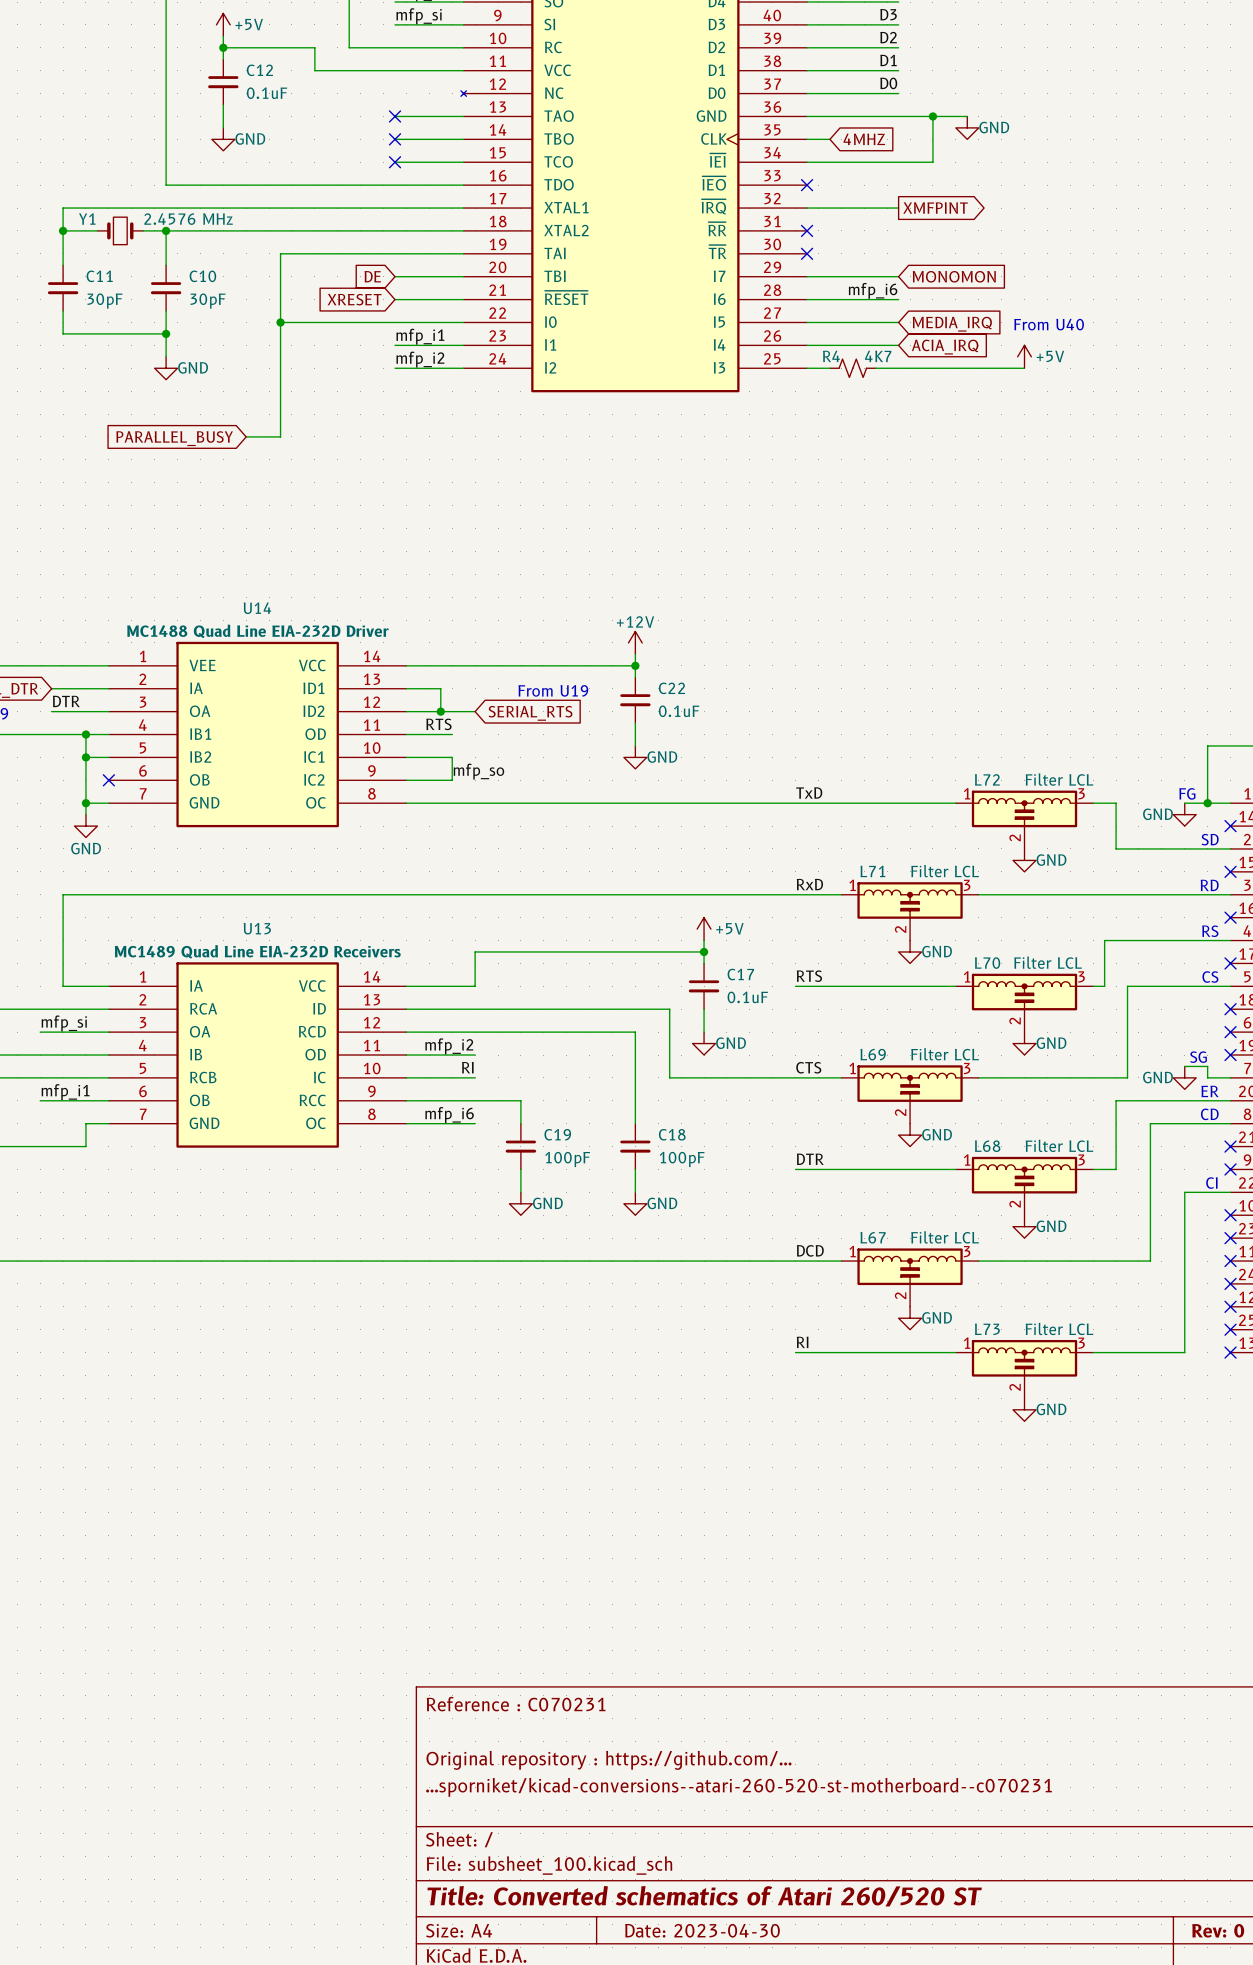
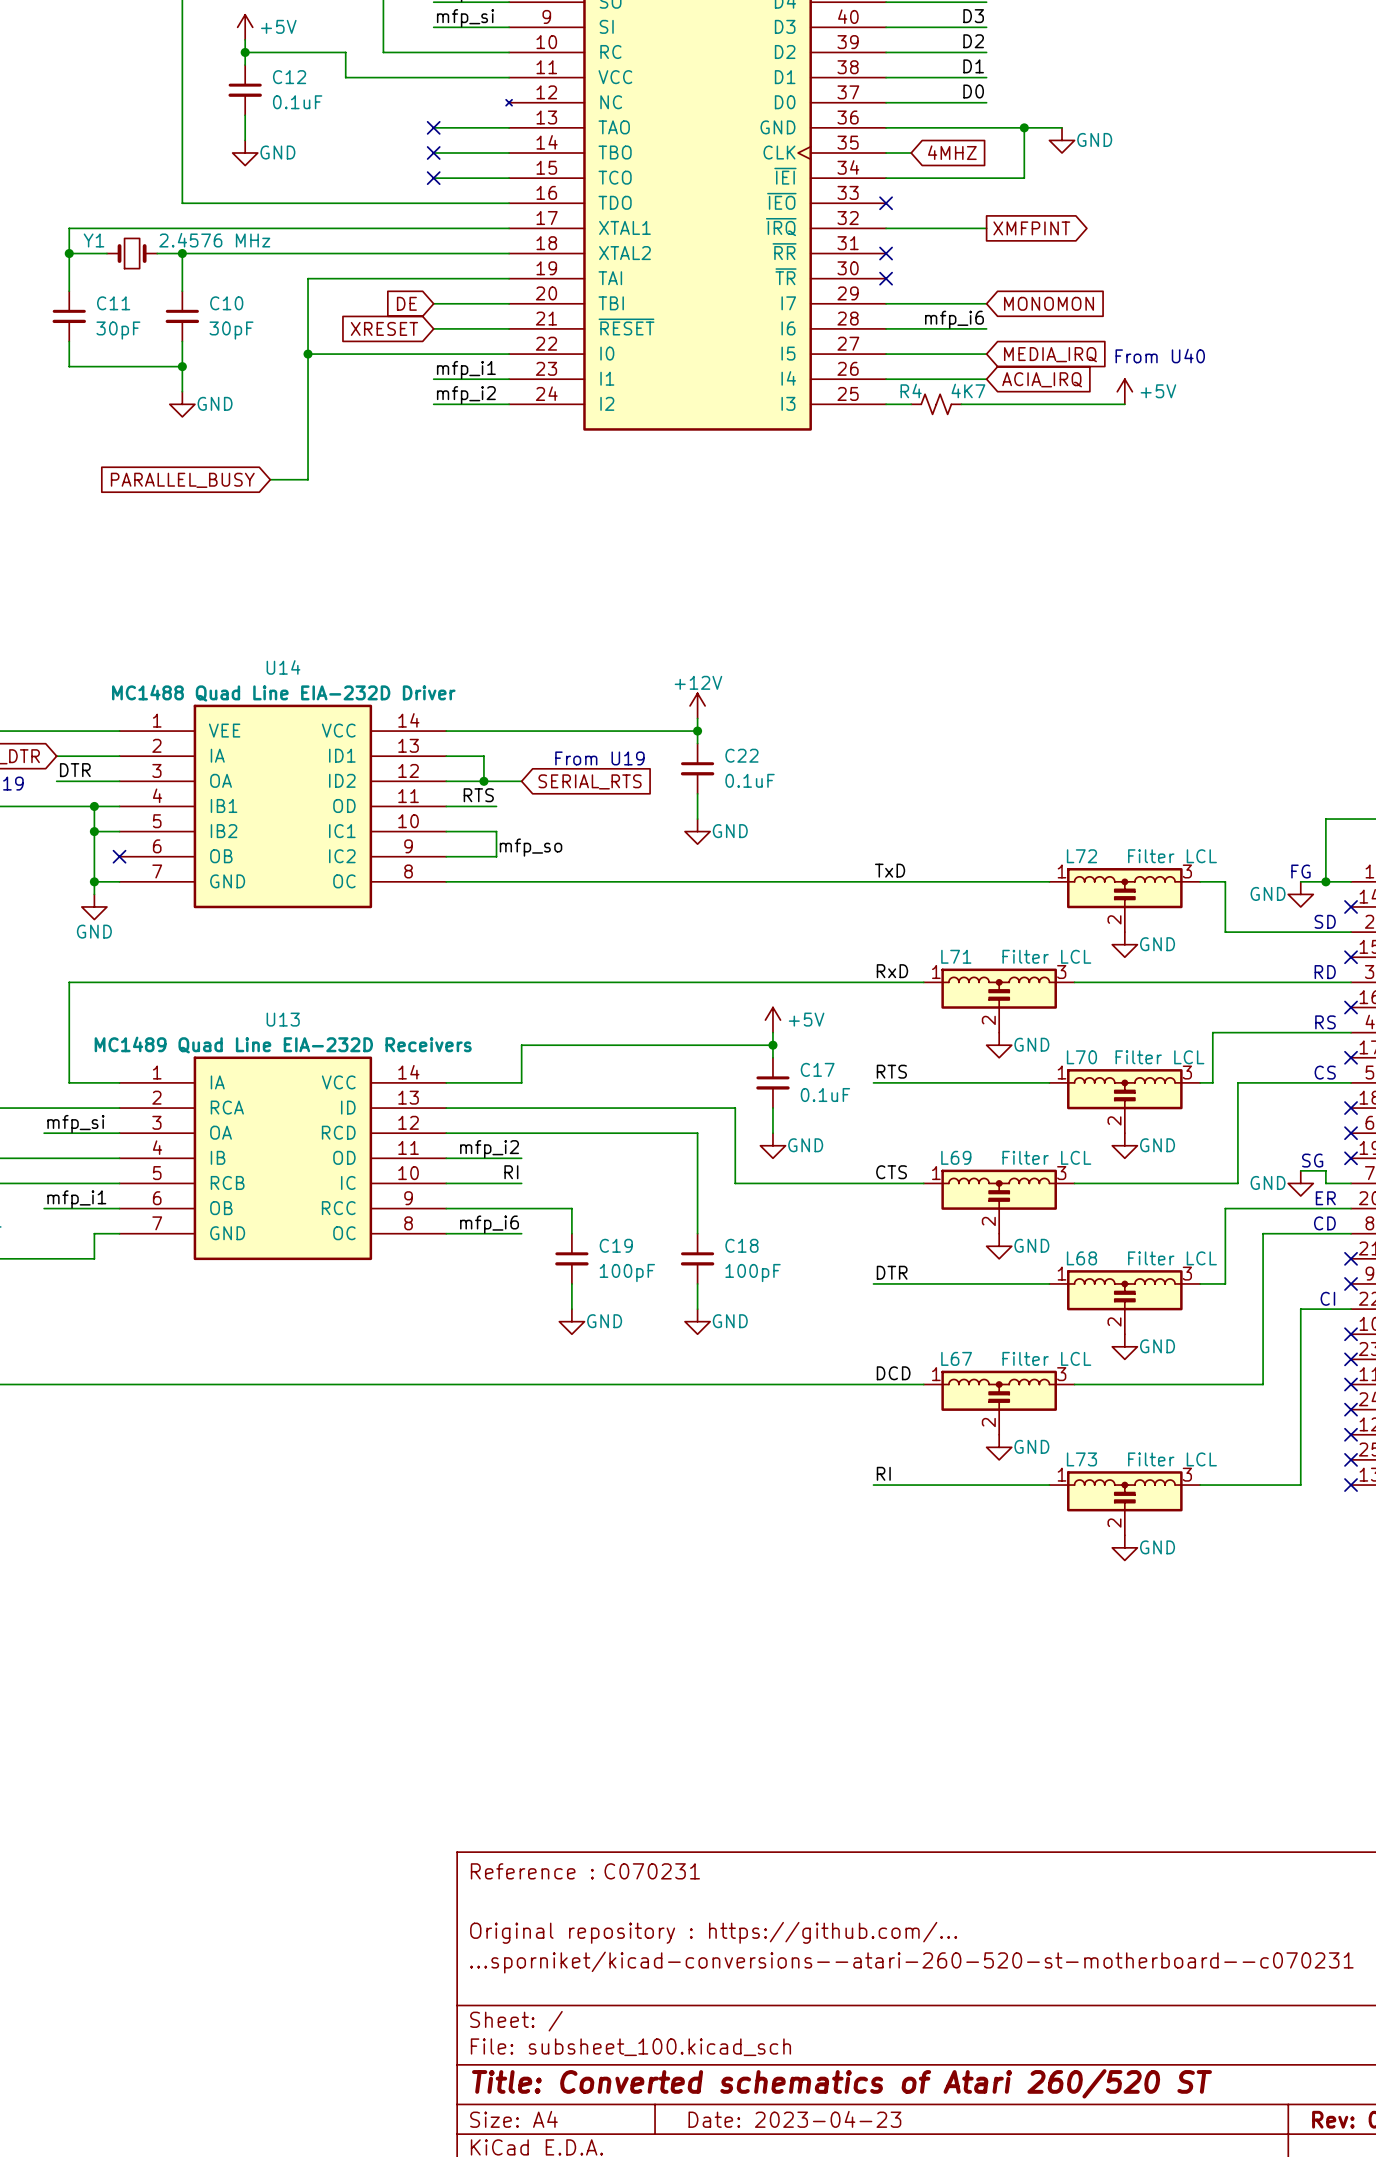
title block: Date: 2023-04-30 (702, 1930) -> Date: 2023-04-23 (794, 2119)

